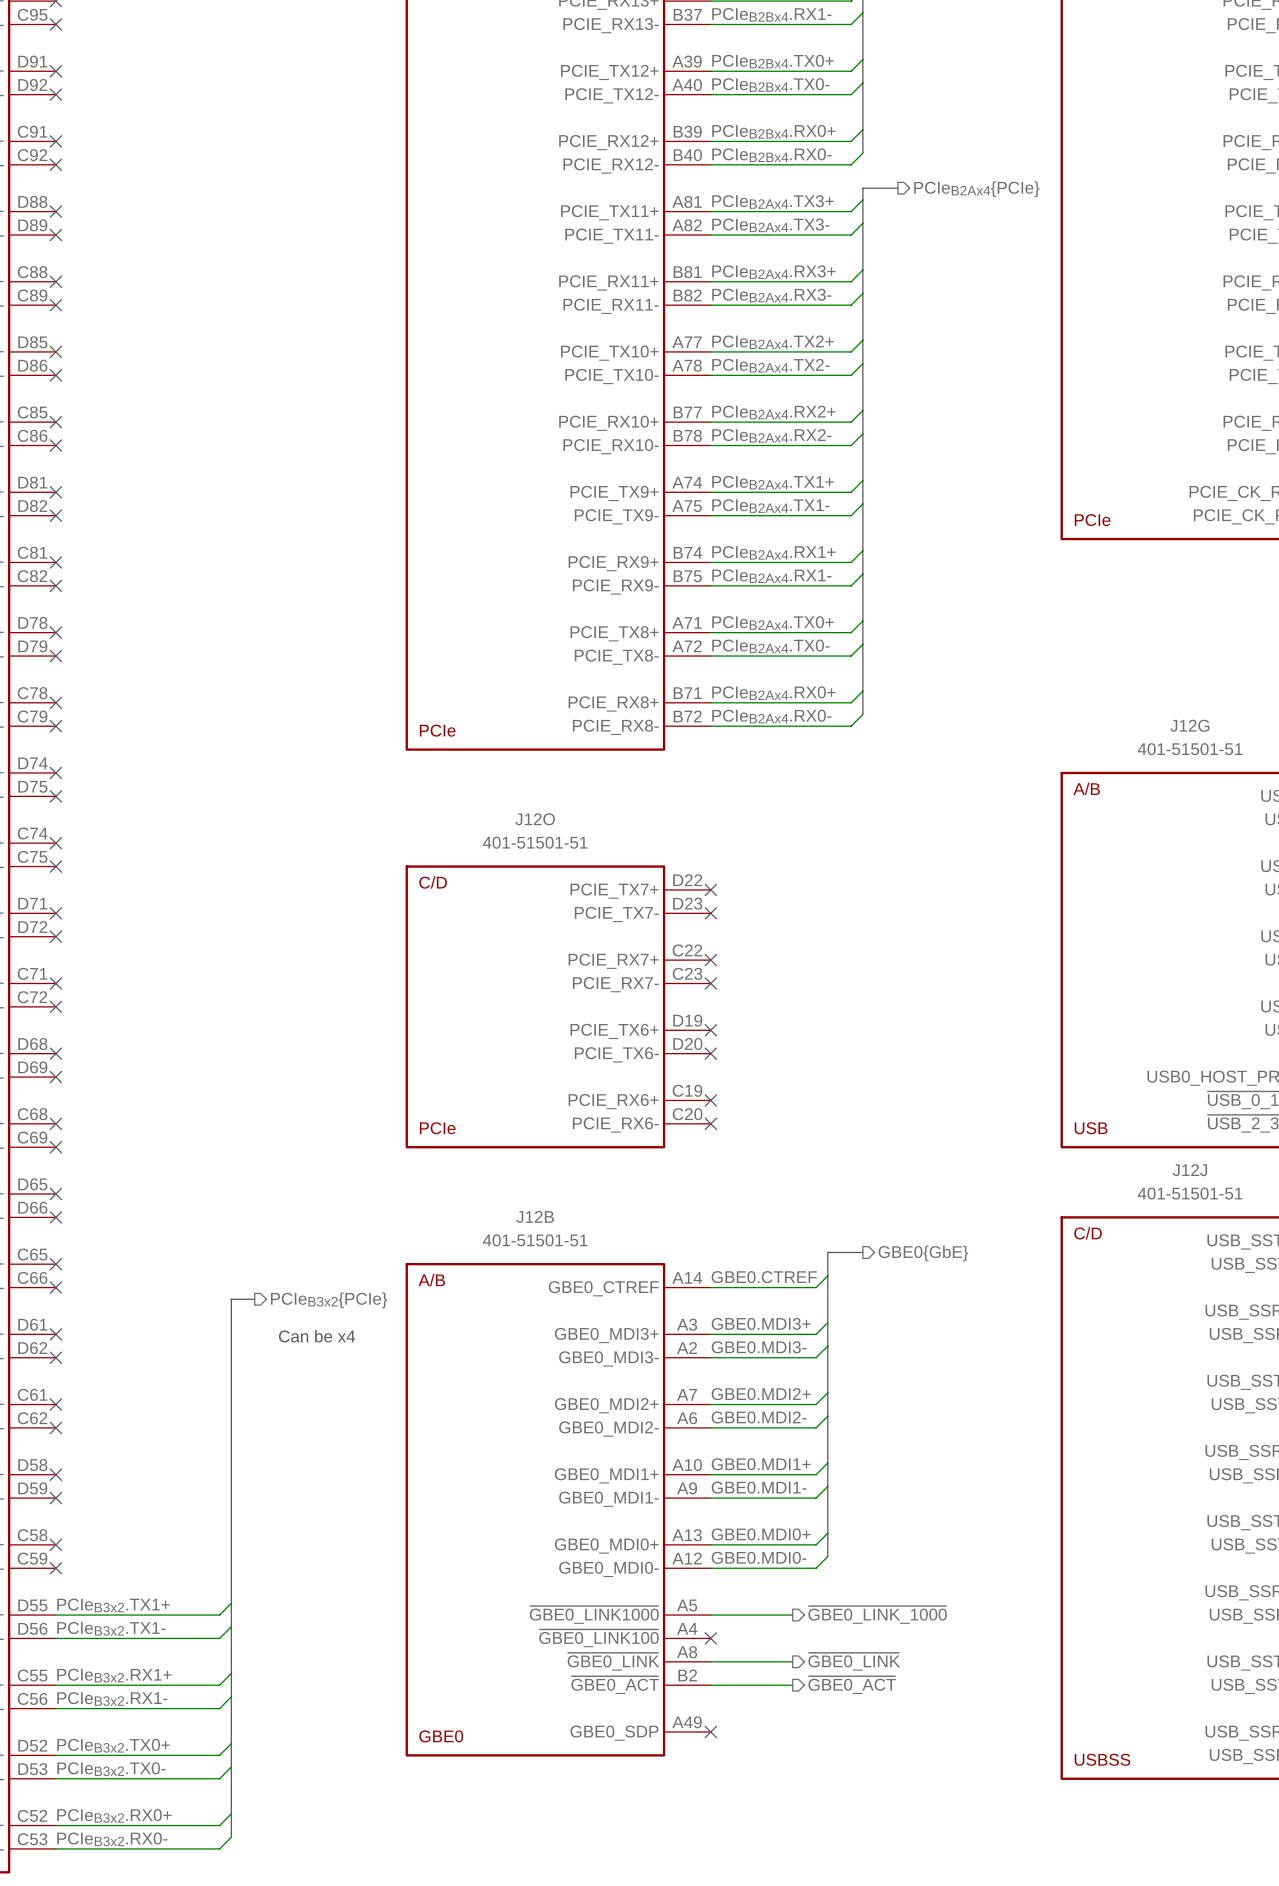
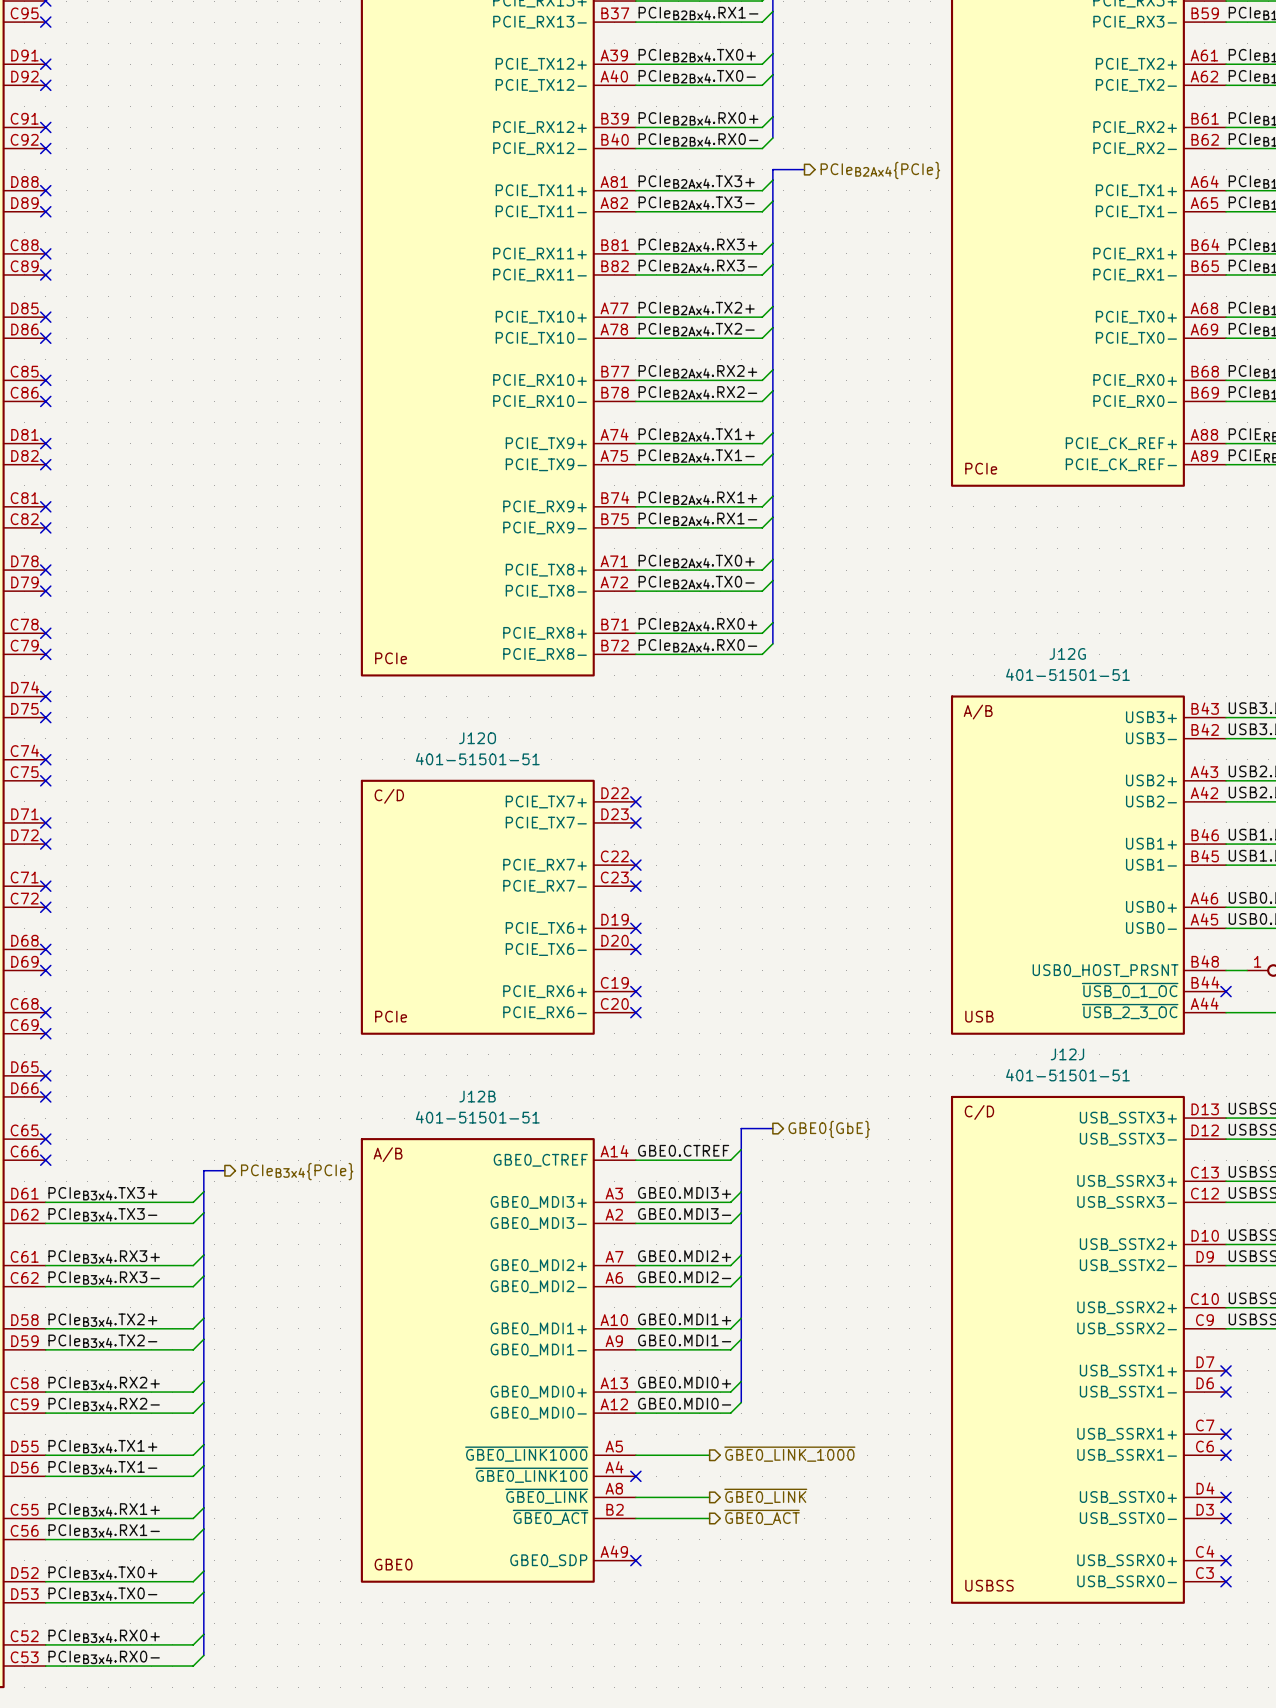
hierarchical label: PCIeB3x2{PCIe} (329, 1300) -> PCIeB3x4{PCIe} (297, 1171)
wire: none -> (203, 1191) (193, 1202) (45, 1202)
label: none -> PCIeB3x4.TX3+ (102, 1193)
no-connect mark: (55, 1334) -> none
text: Can be x4 (317, 1336) -> none
wire: none -> (203, 1212) (193, 1223) (45, 1223)
label: none -> PCIeB3x4.TX3- (102, 1214)
no-connect mark: (55, 1357) -> none
wire: none -> (203, 1255) (193, 1265) (45, 1265)
label: none -> PCIeB3x4.RX3+ (104, 1256)
no-connect mark: (55, 1404) -> none
wire: none -> (203, 1276) (193, 1286) (45, 1286)
label: none -> PCIeB3x4.RX3- (104, 1278)
no-connect mark: (55, 1427) -> none
wire: none -> (203, 1318) (193, 1328) (45, 1328)
label: none -> PCIeB3x4.TX2+ (102, 1320)
no-connect mark: (55, 1474) -> none
wire: none -> (203, 1339) (193, 1349) (45, 1349)
label: none -> PCIeB3x4.TX2- (102, 1341)
no-connect mark: (55, 1498) -> none
wire: none -> (203, 1381) (193, 1392) (45, 1392)
label: none -> PCIeB3x4.RX2+ (104, 1383)
no-connect mark: (55, 1544) -> none
wire: none -> (203, 1402) (193, 1413) (45, 1413)
label: none -> PCIeB3x4.RX2- (104, 1404)
no-connect mark: (55, 1568) -> none
label: PCIeB3x2.TX1+ (113, 1605) -> PCIeB3x4.TX1+ (102, 1446)
label: PCIeB3x2.TX1- (111, 1628) -> PCIeB3x4.TX1- (102, 1467)
label: PCIeB3x2.RX1+ (114, 1675) -> PCIeB3x4.RX1+ (104, 1509)
label: PCIeB3x2.RX1- (112, 1699) -> PCIeB3x4.RX1- (104, 1530)
label: PCIeB3x2.TX0+ (113, 1745) -> PCIeB3x4.TX0+ (102, 1573)
label: PCIeB3x2.TX0- (111, 1769) -> PCIeB3x4.TX0- (102, 1594)
label: PCIeB3x2.RX0+ (114, 1815) -> PCIeB3x4.RX0+ (104, 1636)
label: PCIeB3x2.RX0- (112, 1839) -> PCIeB3x4.RX0- (104, 1657)

